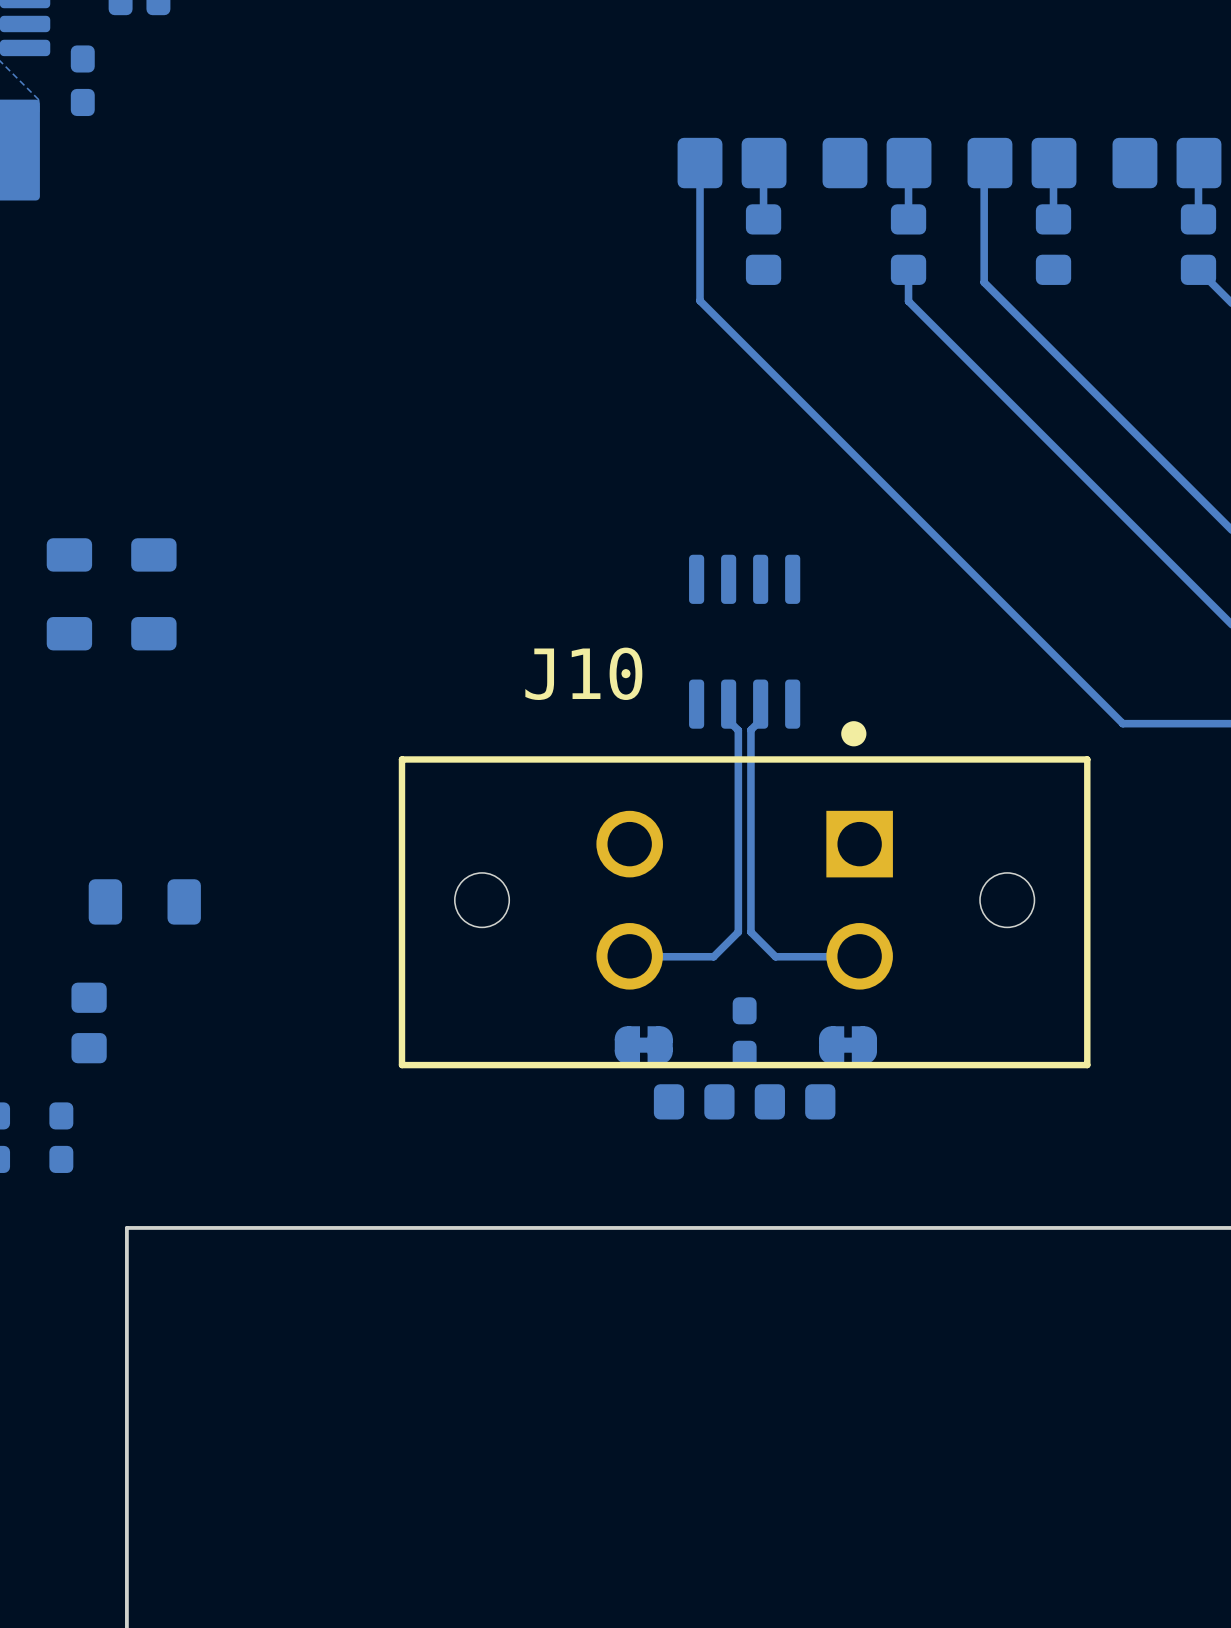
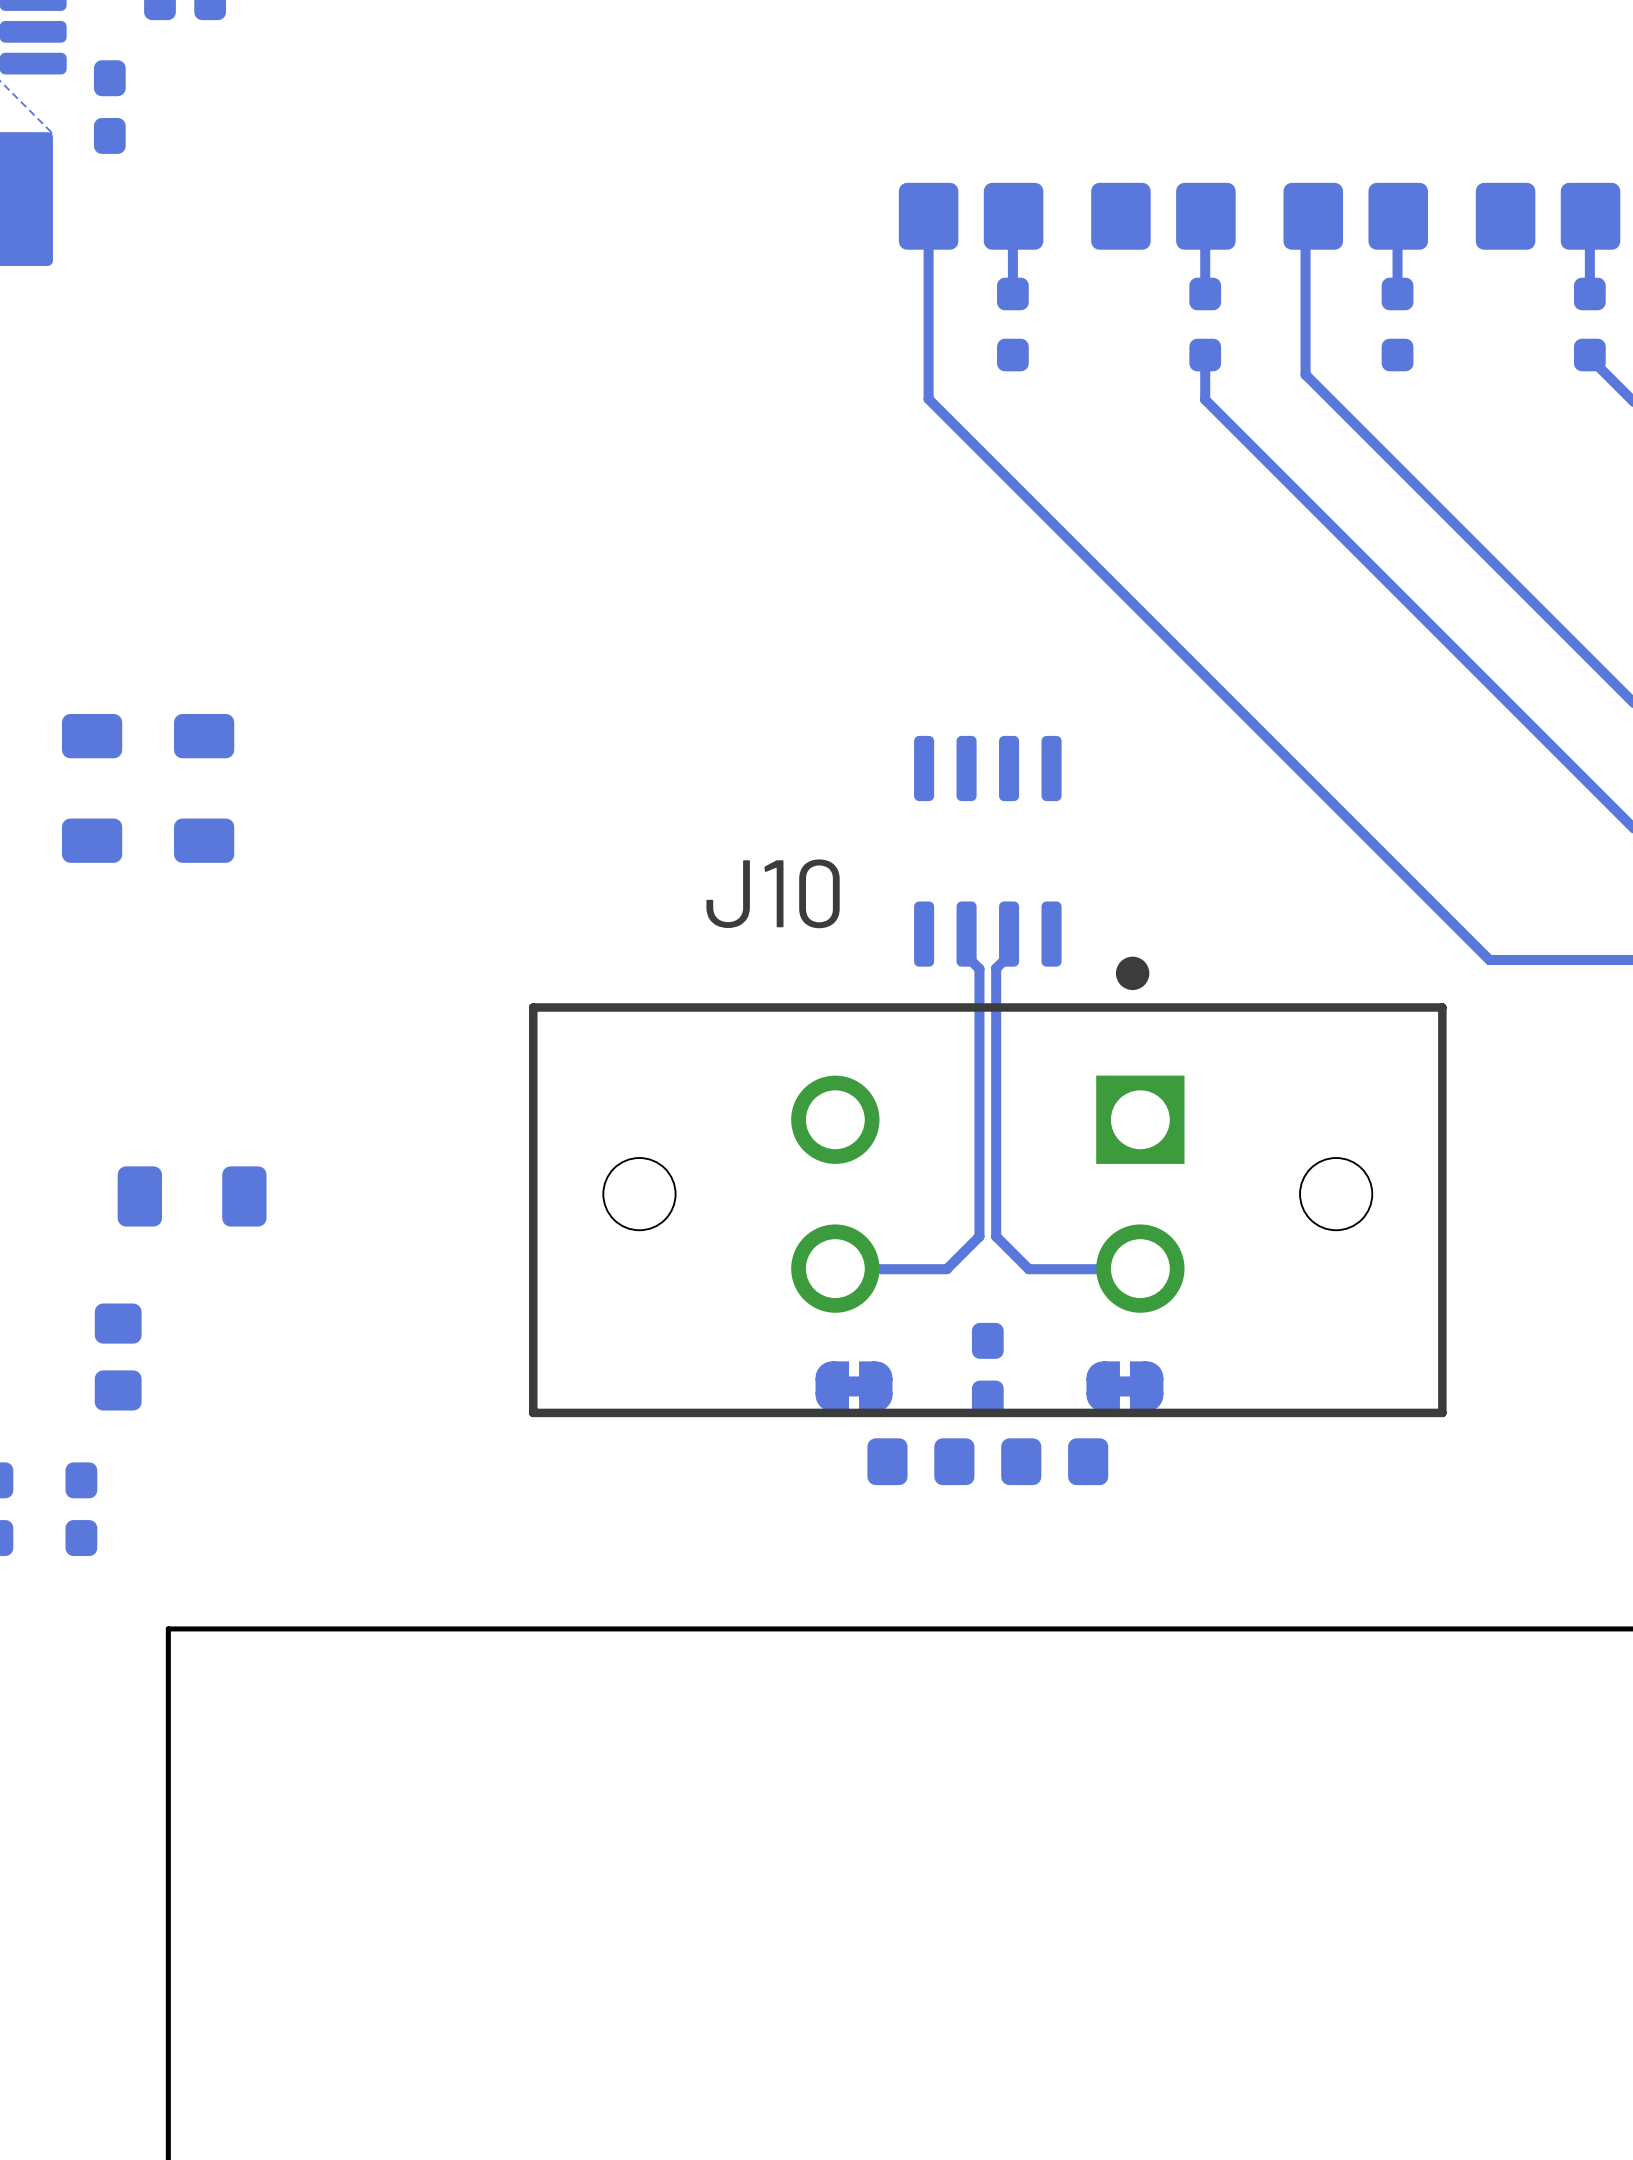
part footprint: [745, 204, 782, 285] -> [997, 277, 1029, 372]
part footprint: [890, 204, 927, 285] -> [1189, 277, 1222, 372]
part footprint: [1035, 204, 1072, 285] -> [1381, 277, 1414, 372]
part footprint: [1180, 204, 1217, 285] -> [1573, 277, 1606, 372]

